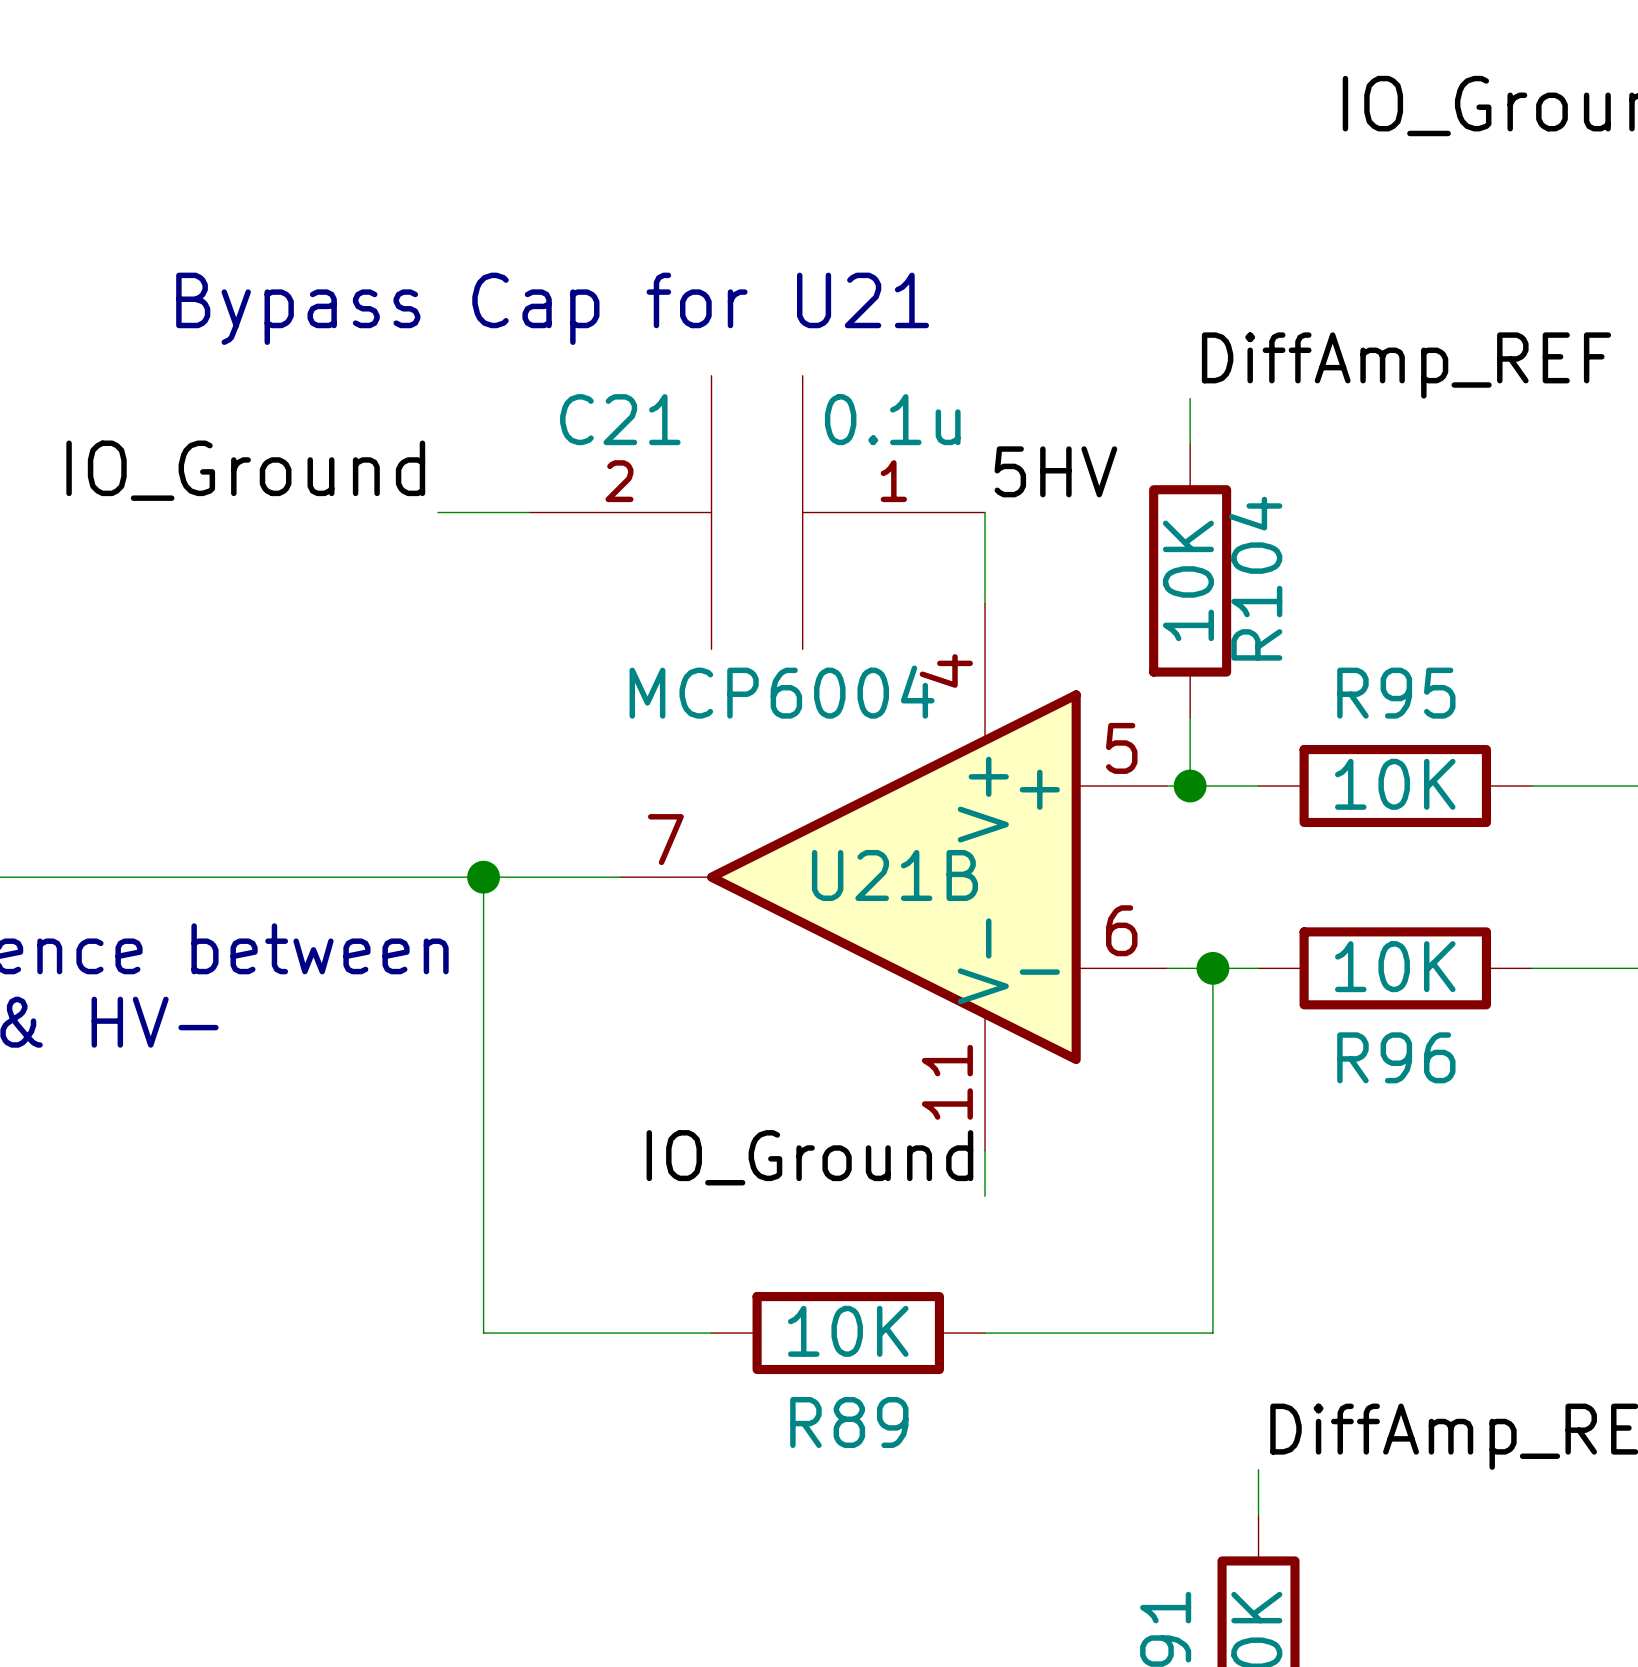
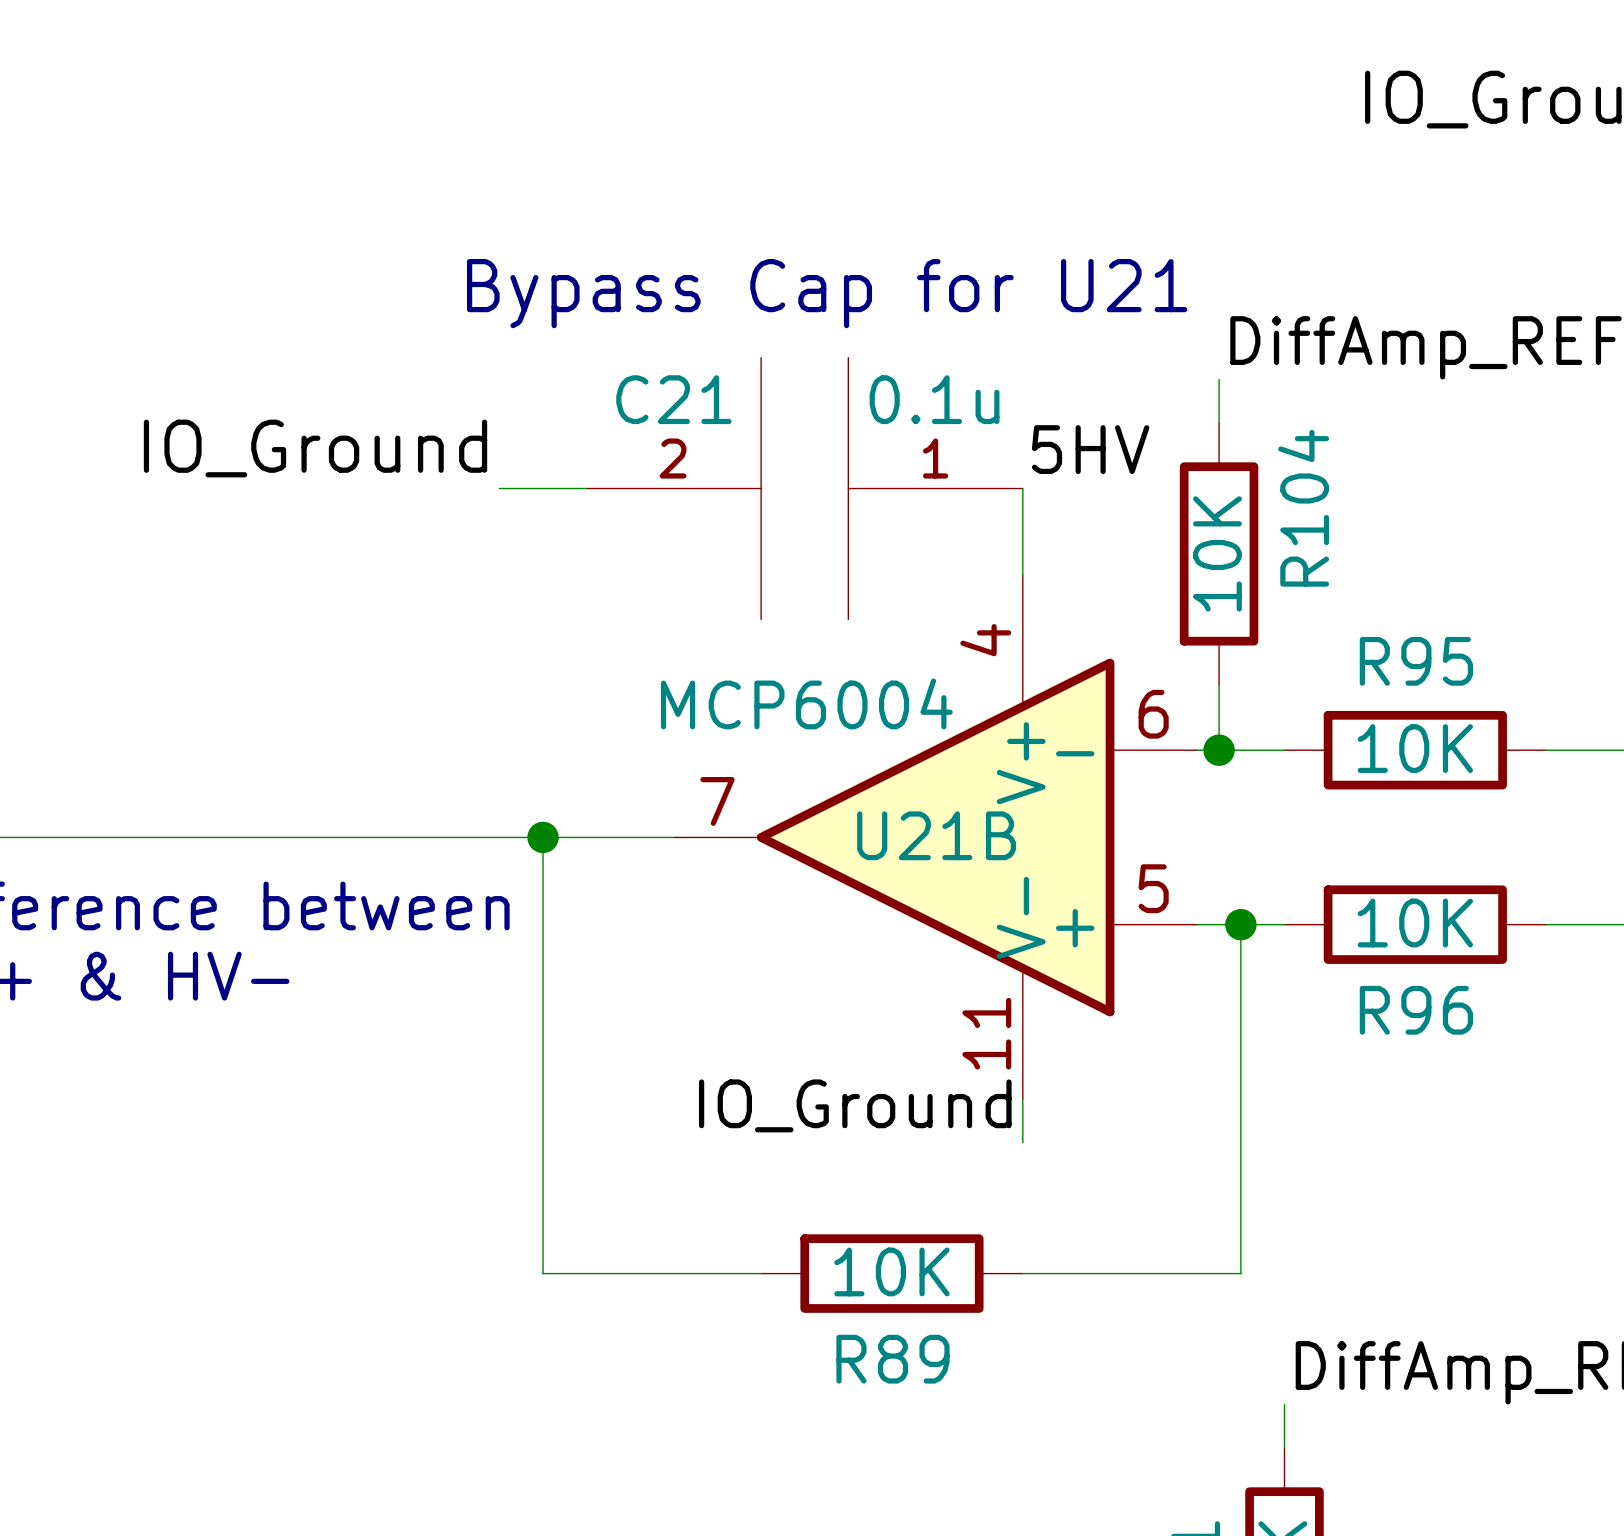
text position: Bypass Cap for U21 (552, 308) -> Bypass Cap for U21 (827, 293)
R104 name position: R104 (1255, 578) -> R104 (1303, 508)
U21B flip: as is (893, 877) -> up-down (935, 837)

